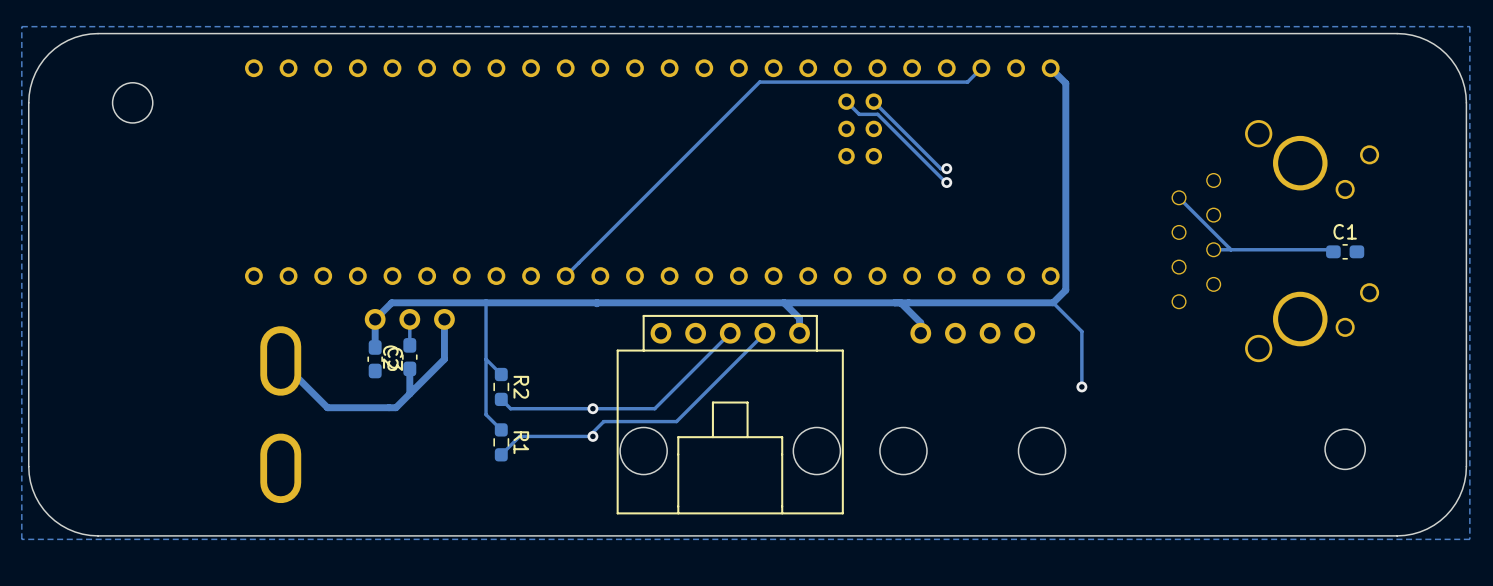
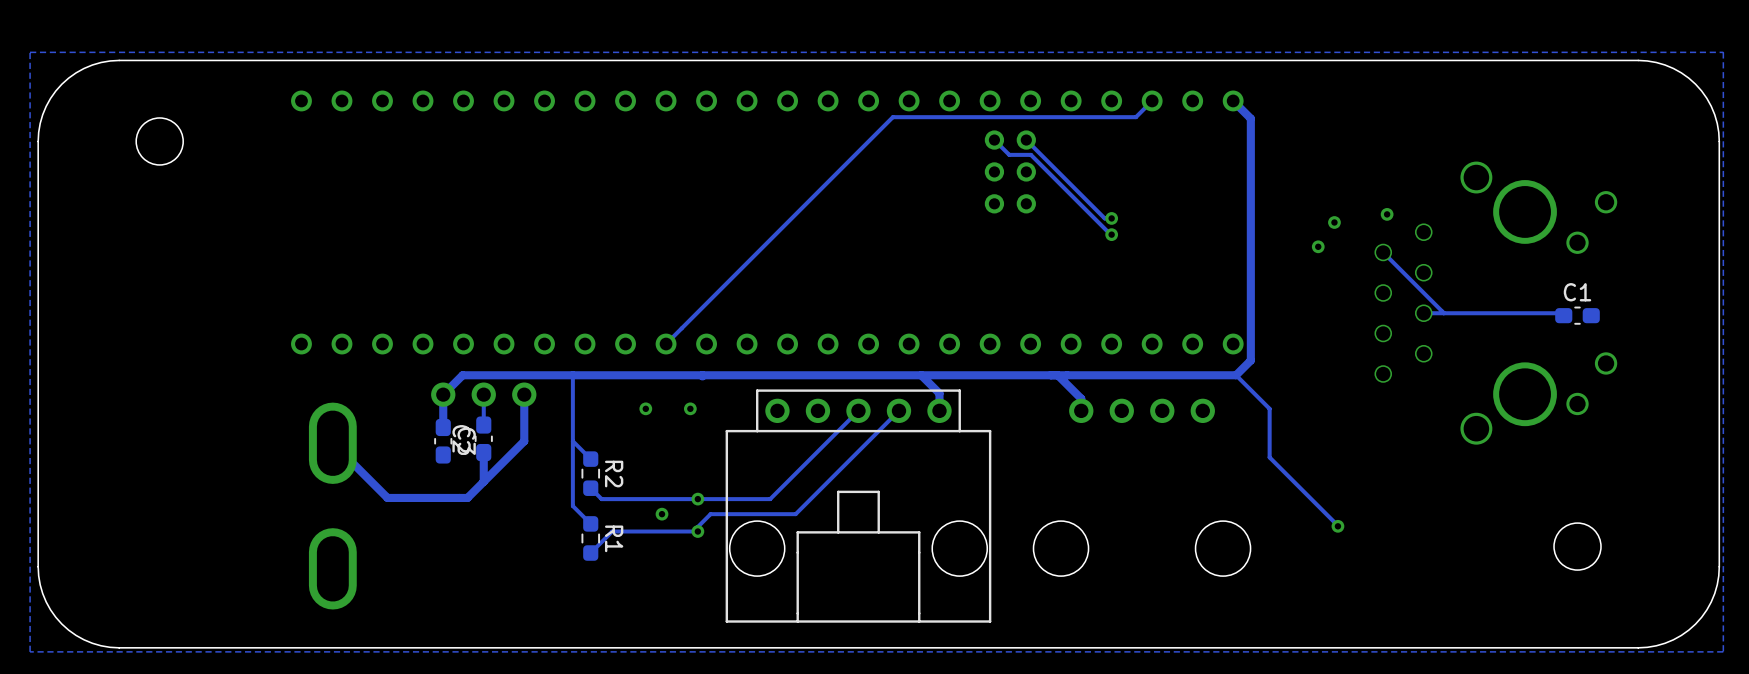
via: none -> (1387, 214)
via: none -> (1334, 222)
via: none -> (1318, 246)
via: none -> (645, 408)
via: none -> (690, 408)
track: (1081, 373) (1081, 386) -> (1269, 457) (1337, 526)
via position: (1081, 386) -> (1337, 526)
via: none -> (662, 514)

